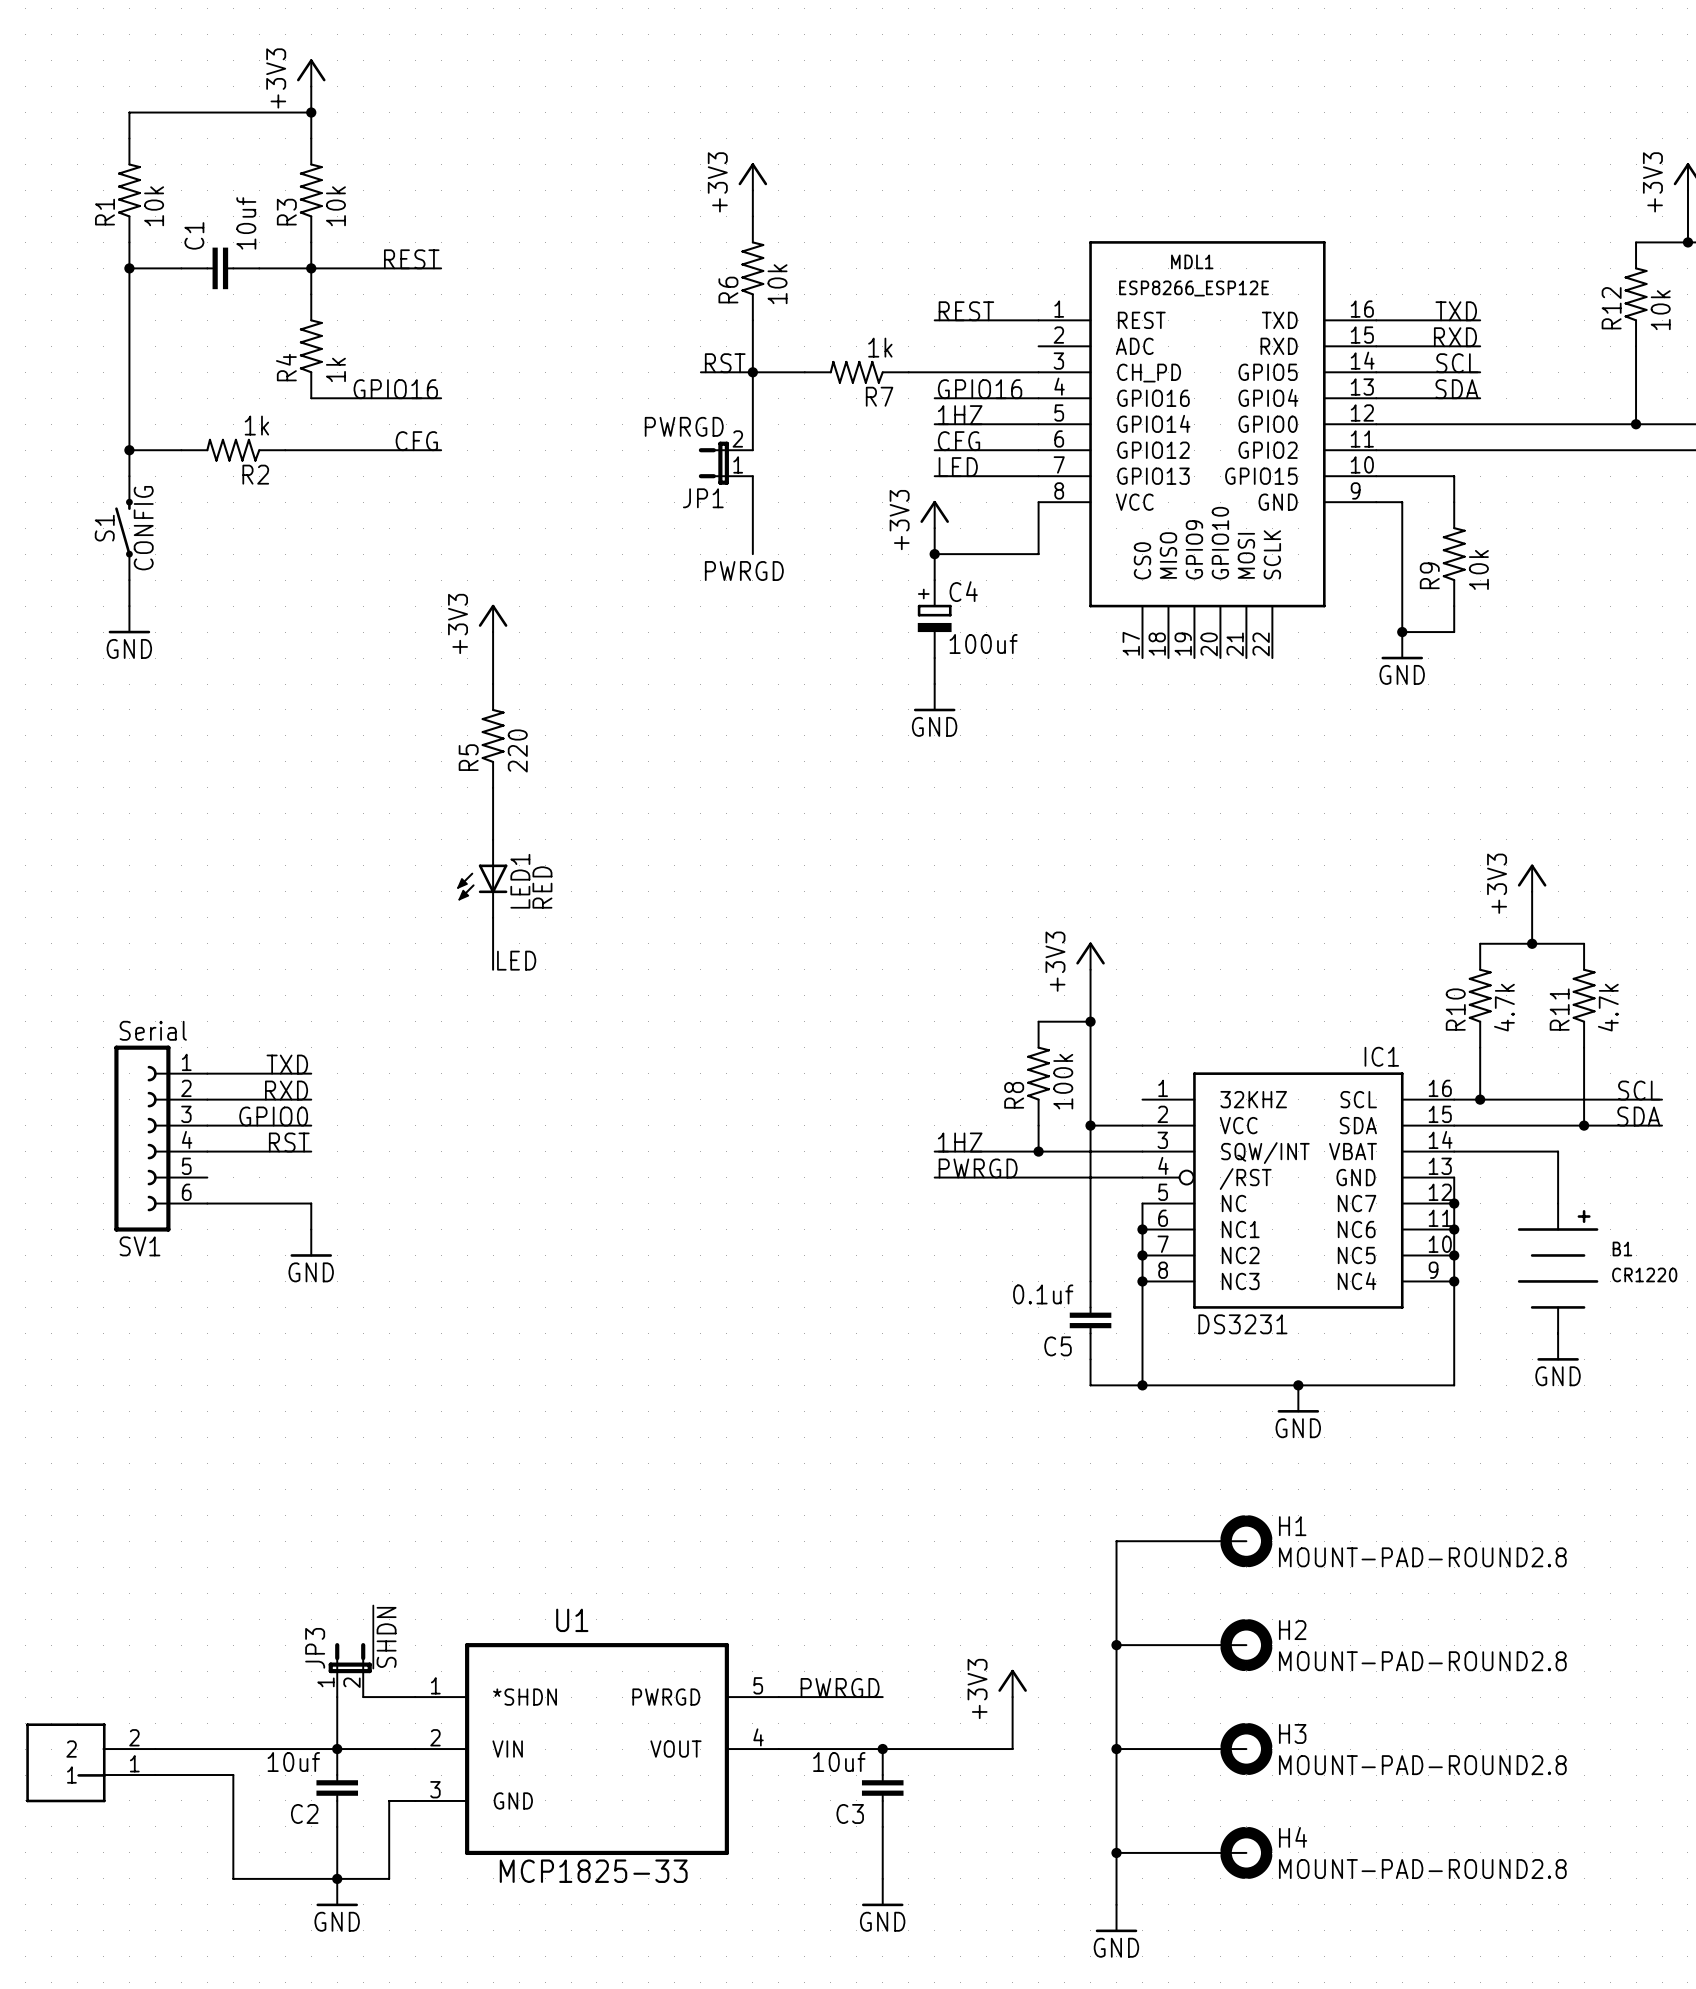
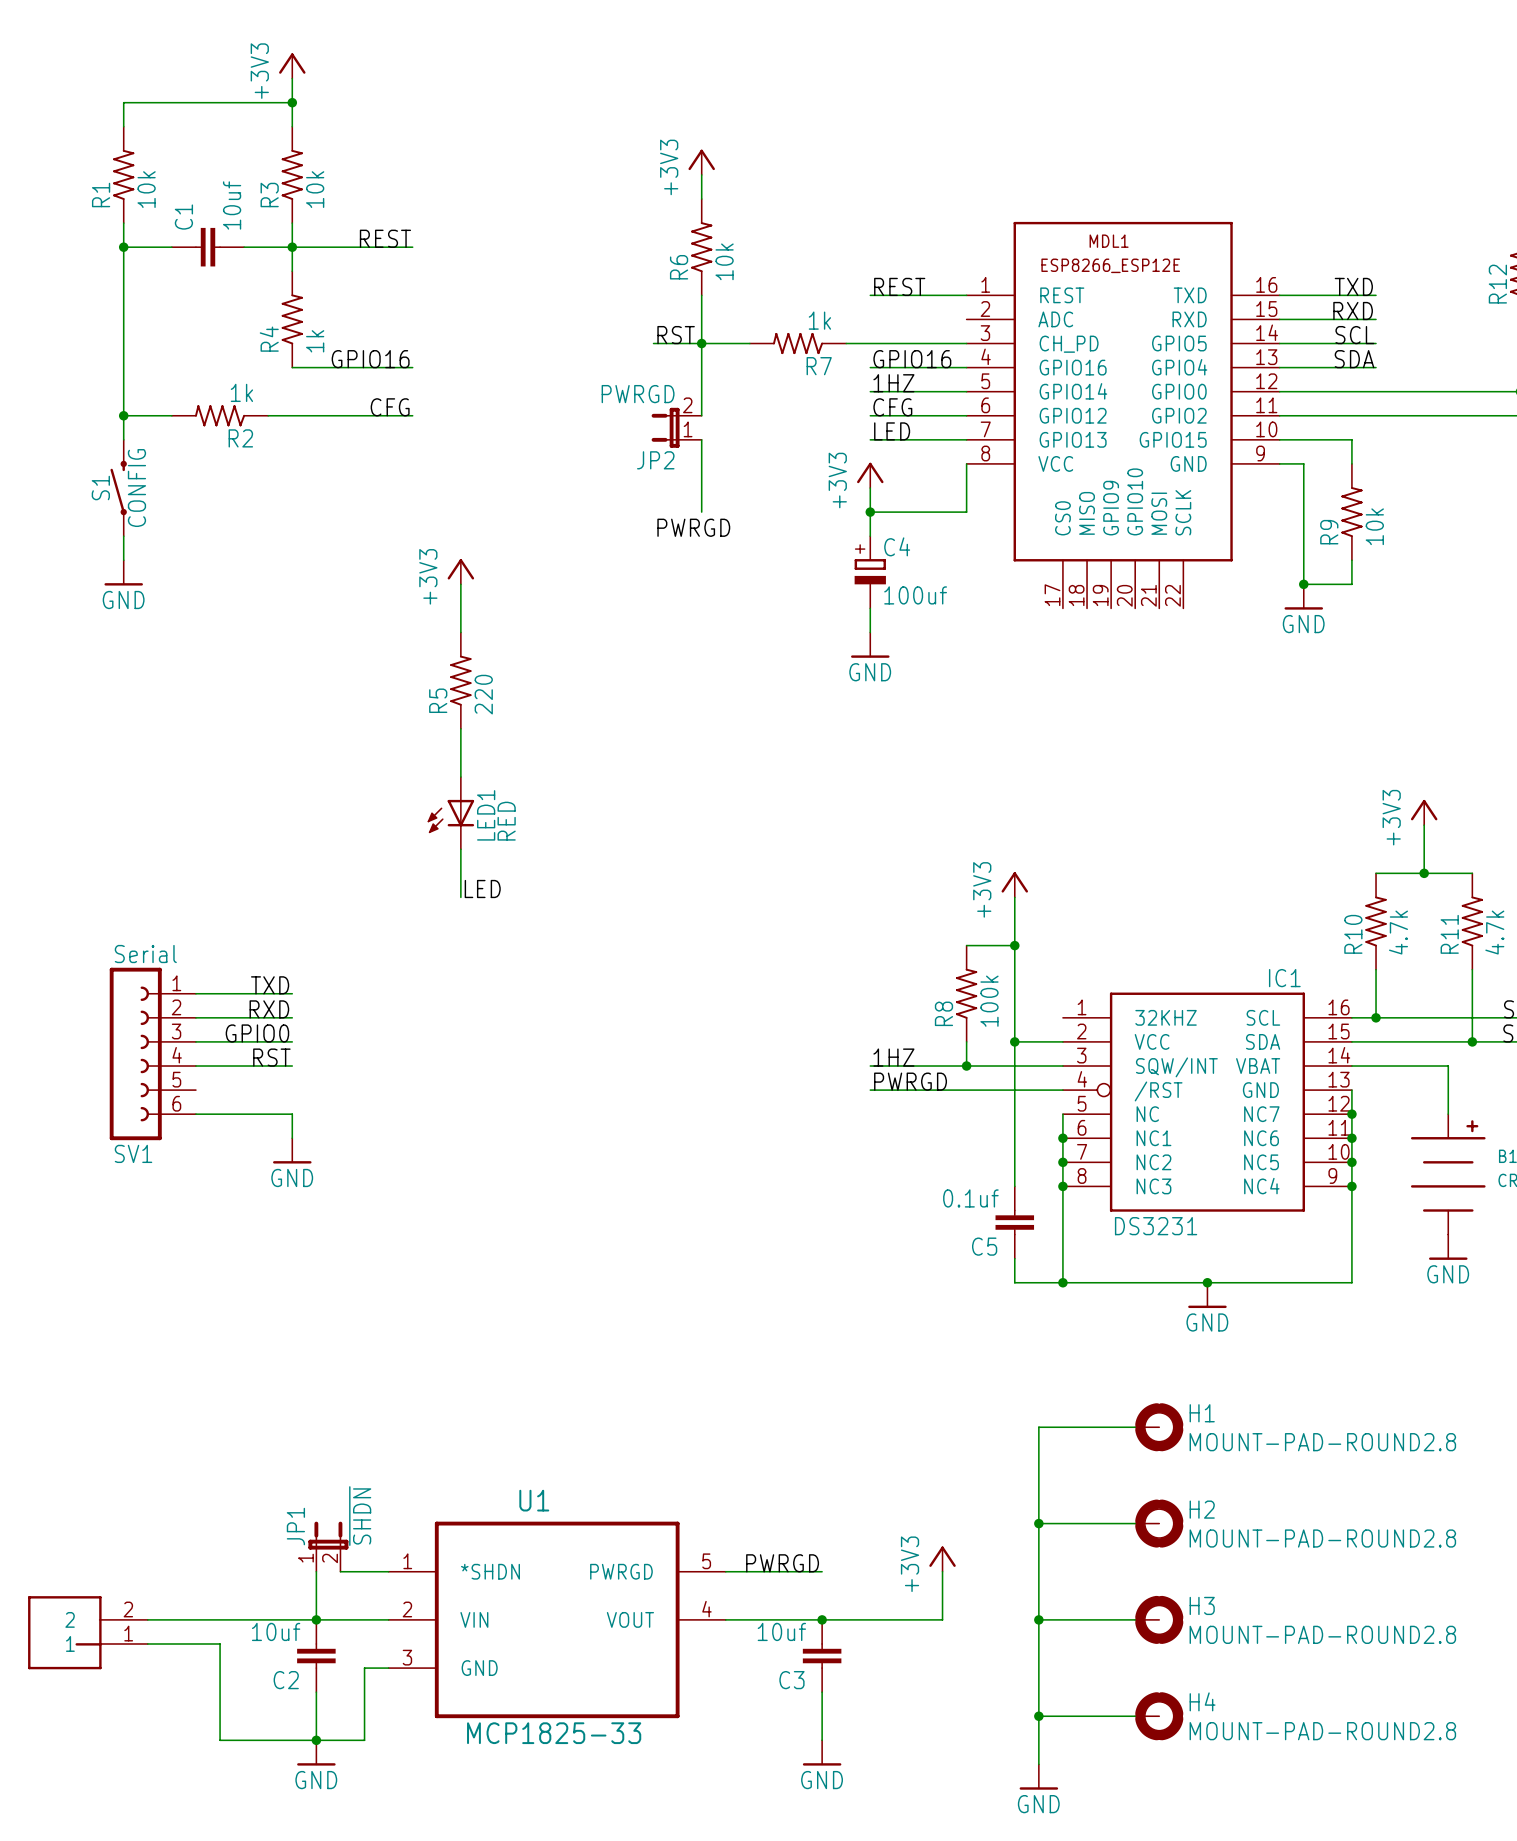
JP1 name: JP1 (703, 498) -> JP2 (655, 460)
JP3 name: JP3 (315, 1648) -> JP1 (295, 1526)

